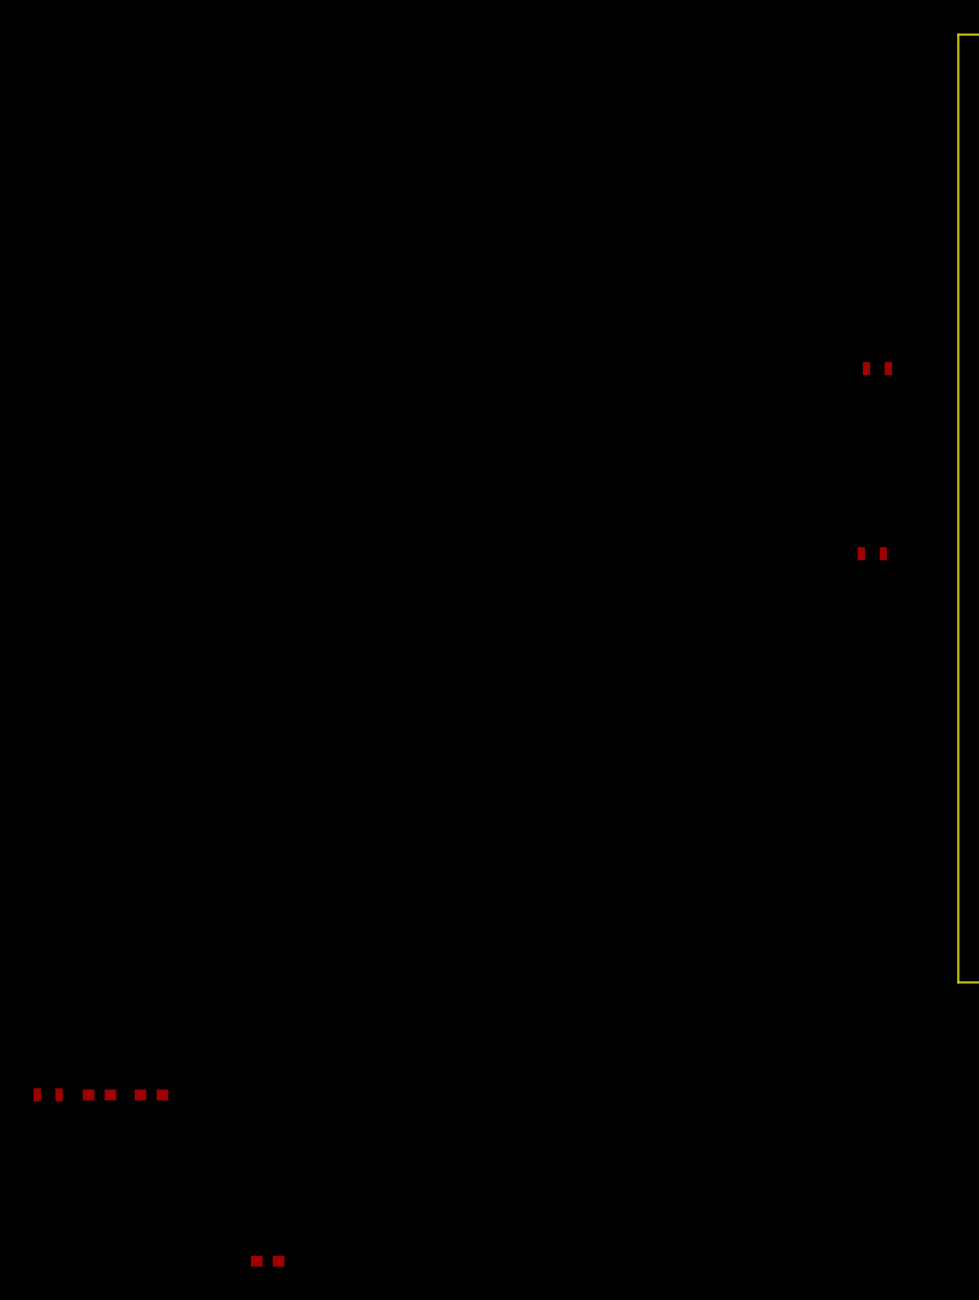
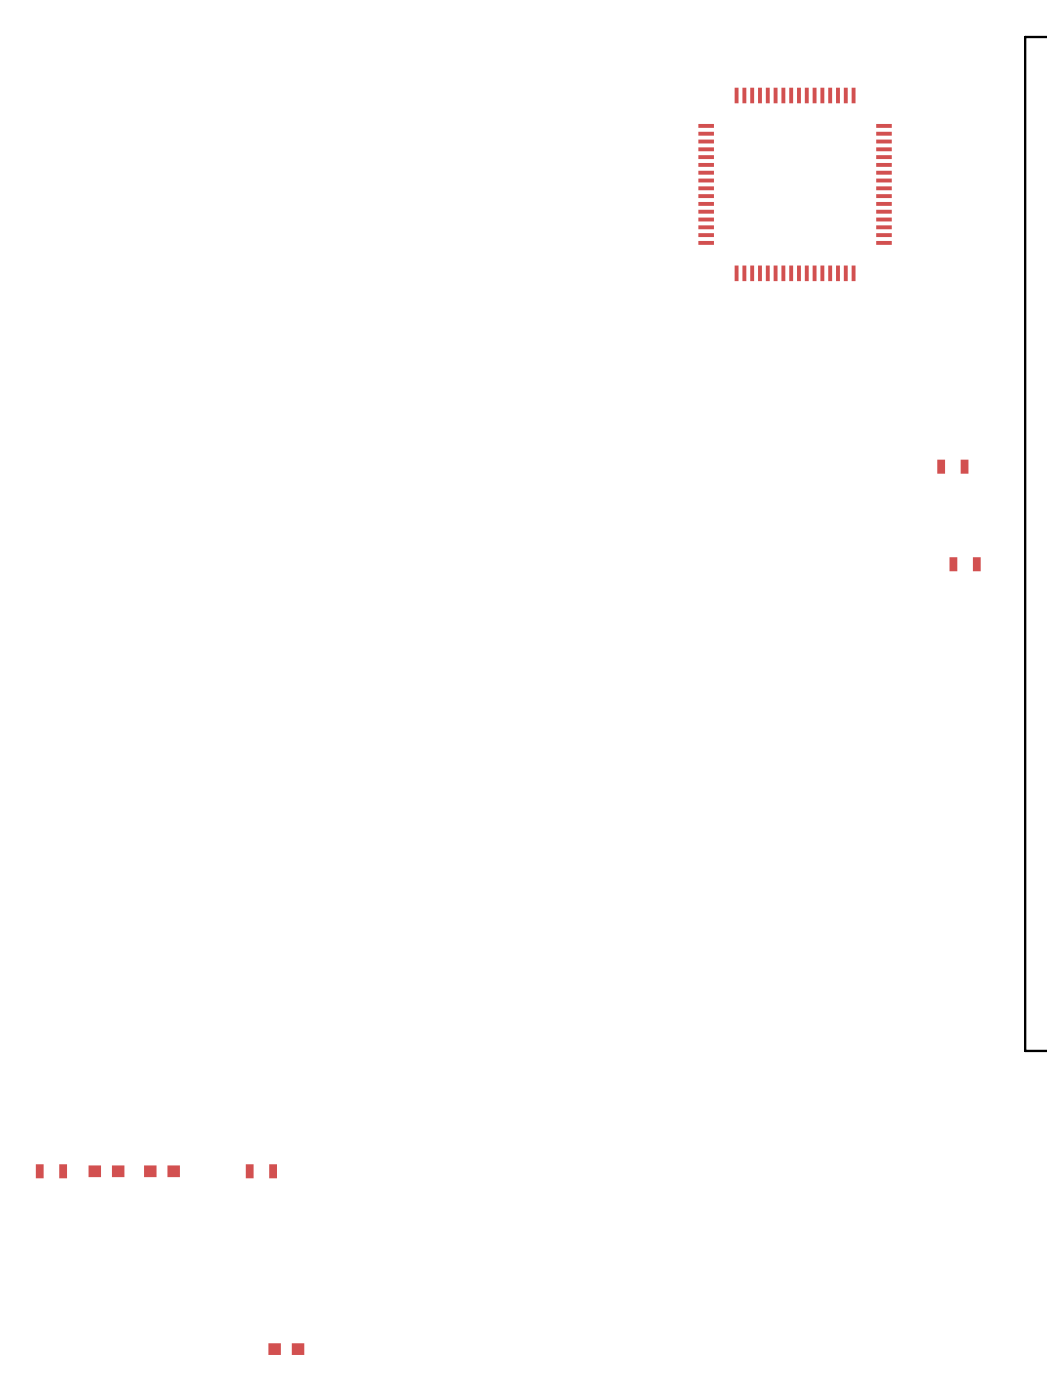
part: none -> (795, 184)
part: (877, 368) -> none
part: none -> (952, 466)
part position: (872, 553) -> (965, 564)
part: none -> (261, 1171)

